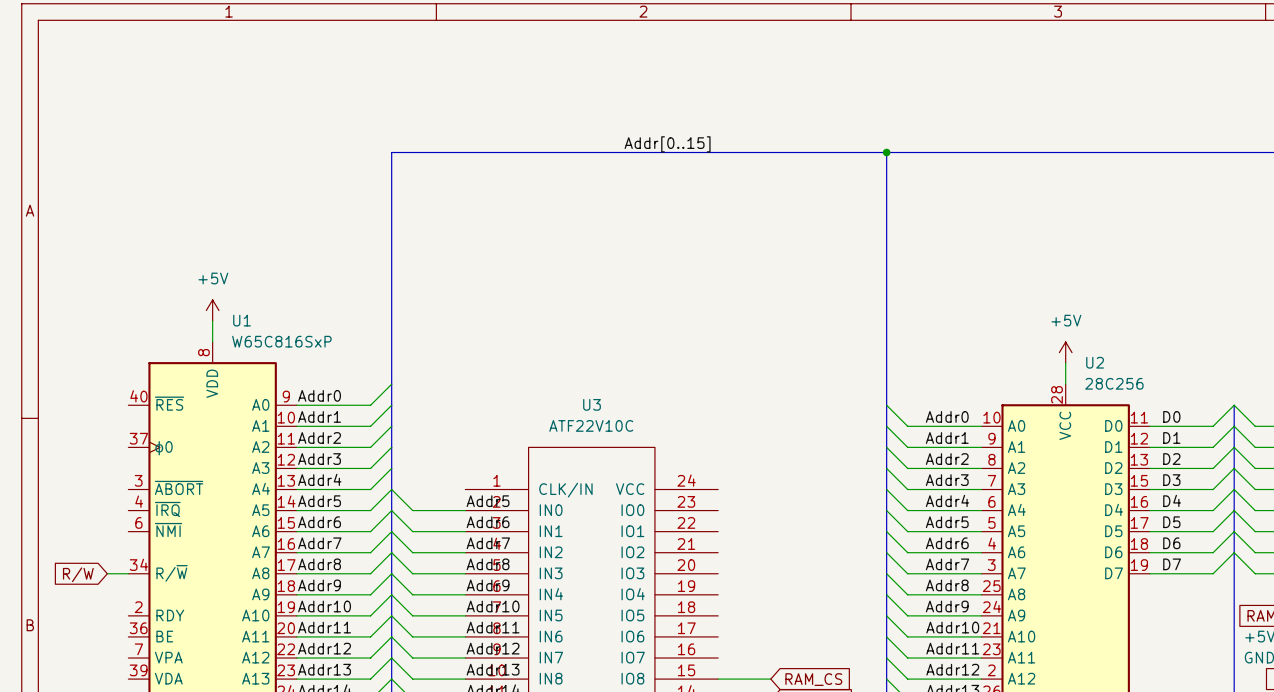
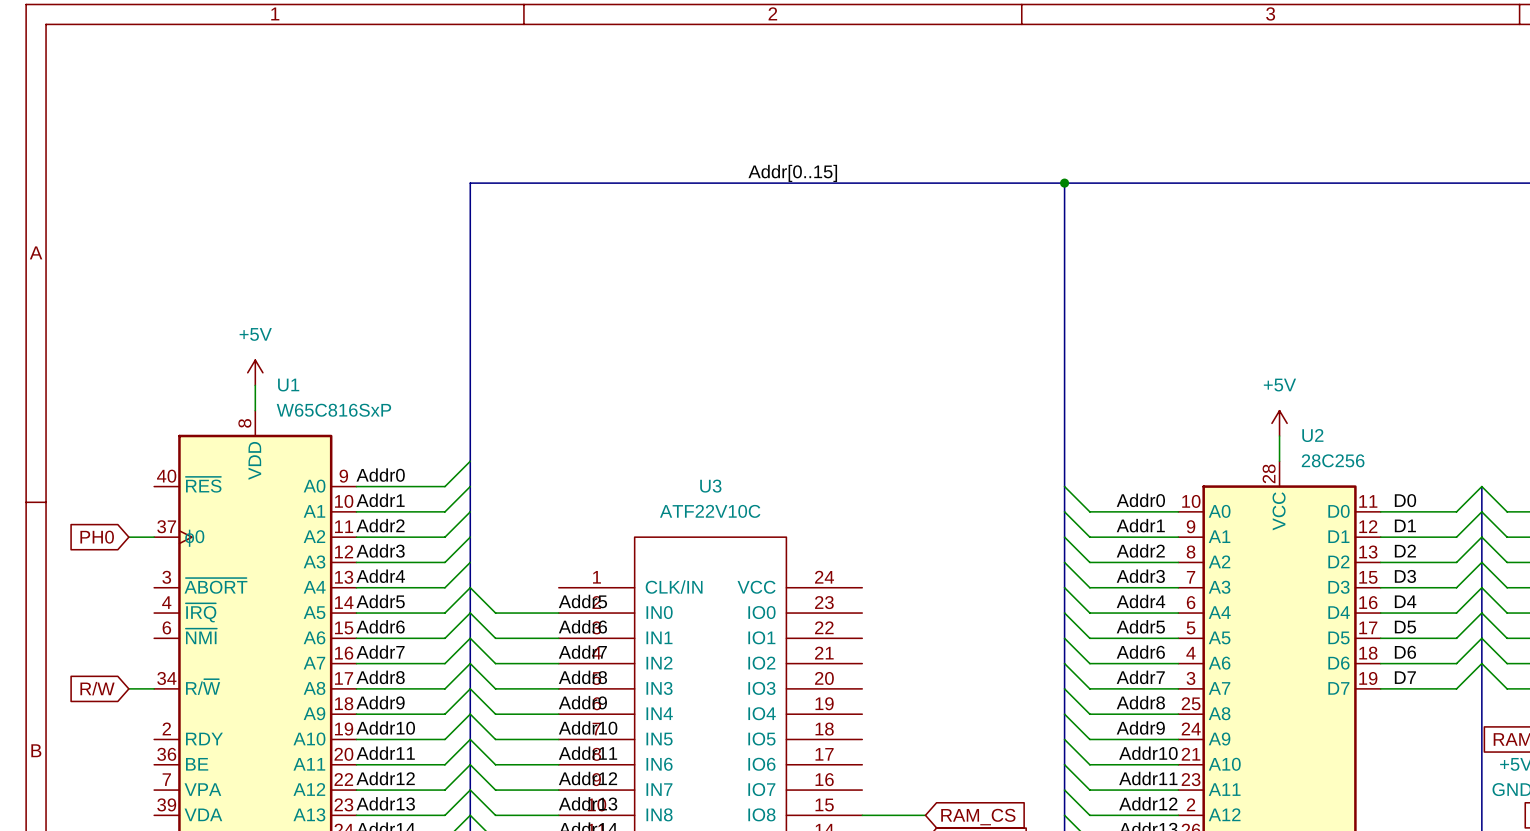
global label: none -> PH0 (97, 537)
wire: none -> (128, 537) (154, 537)

